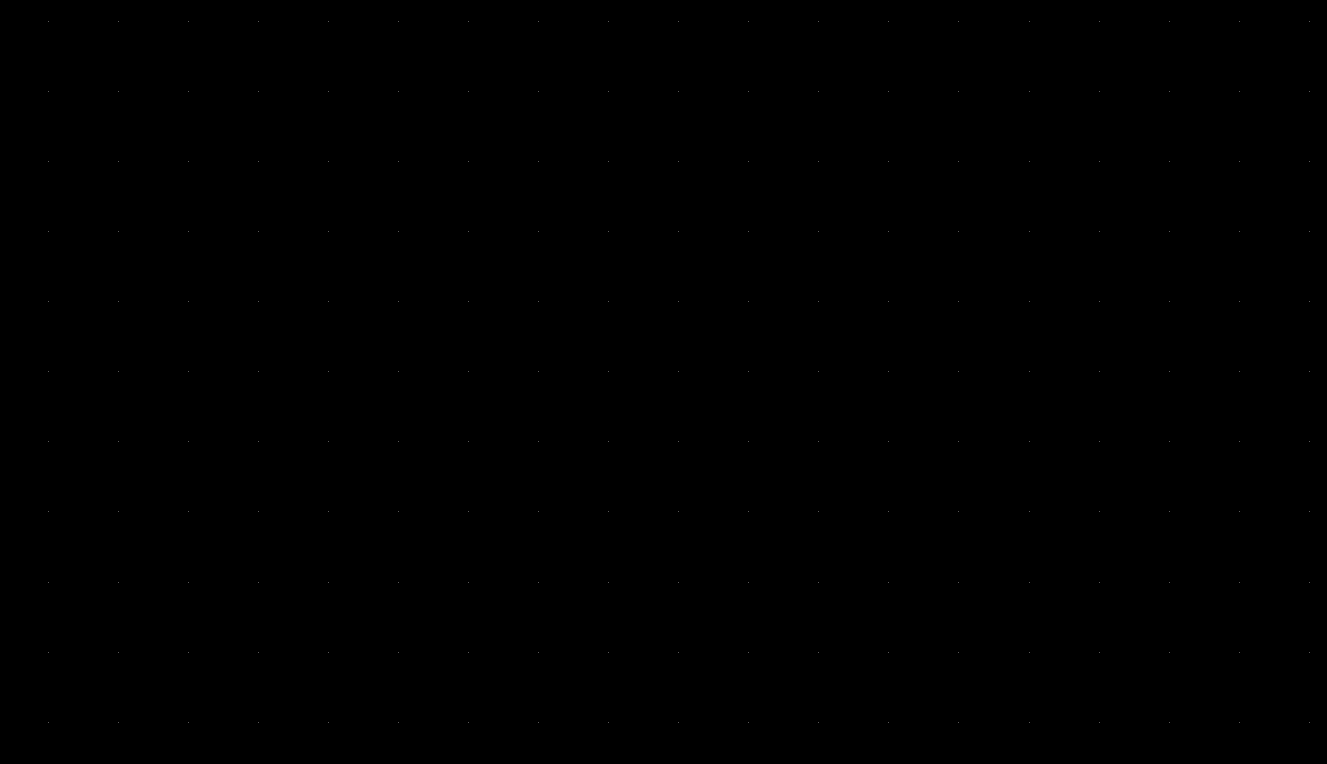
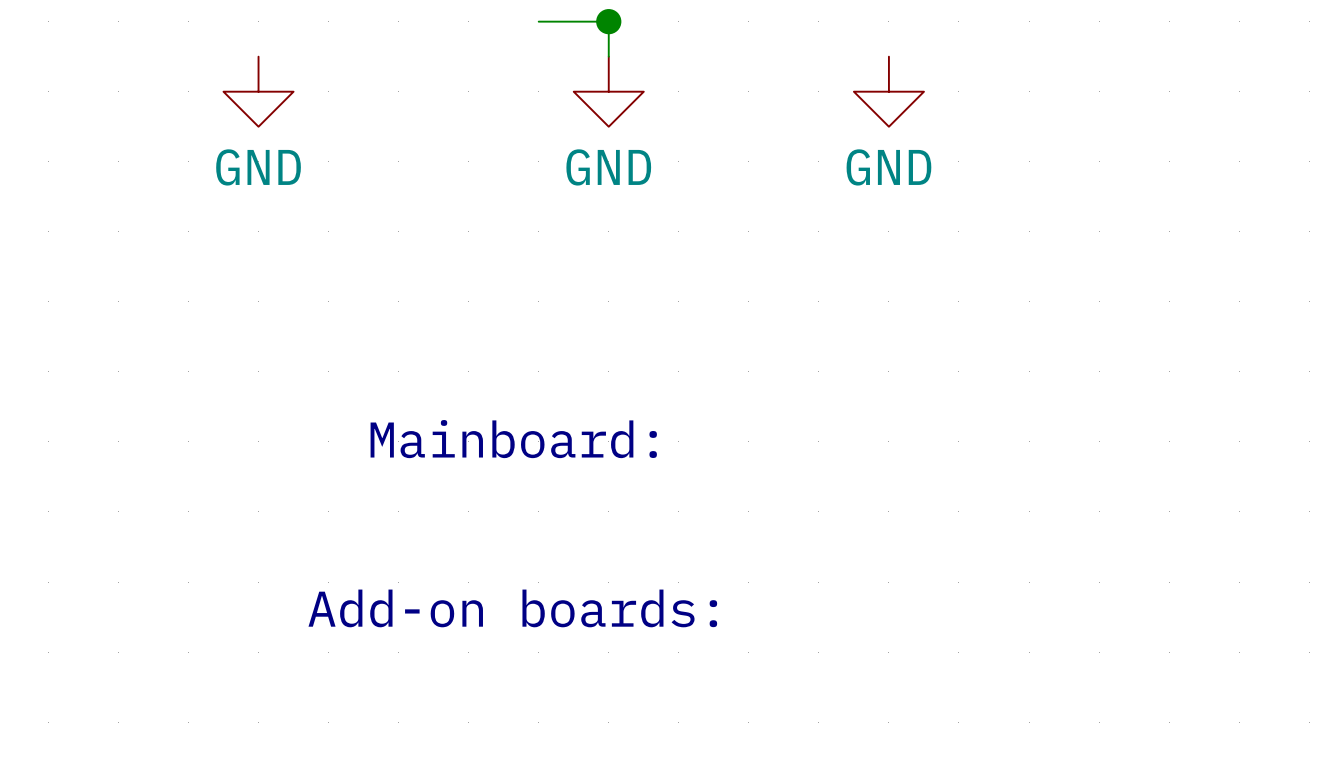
wire: none -> (538, 21) (608, 21) (608, 56)
junction: none -> (608, 21)
power symbol: none -> GND (258, 91)
power symbol: none -> GND (608, 91)
power symbol: none -> GND (888, 91)
text: none -> Mainboard: (513, 439)
text: none -> Add-on boards: (512, 608)

